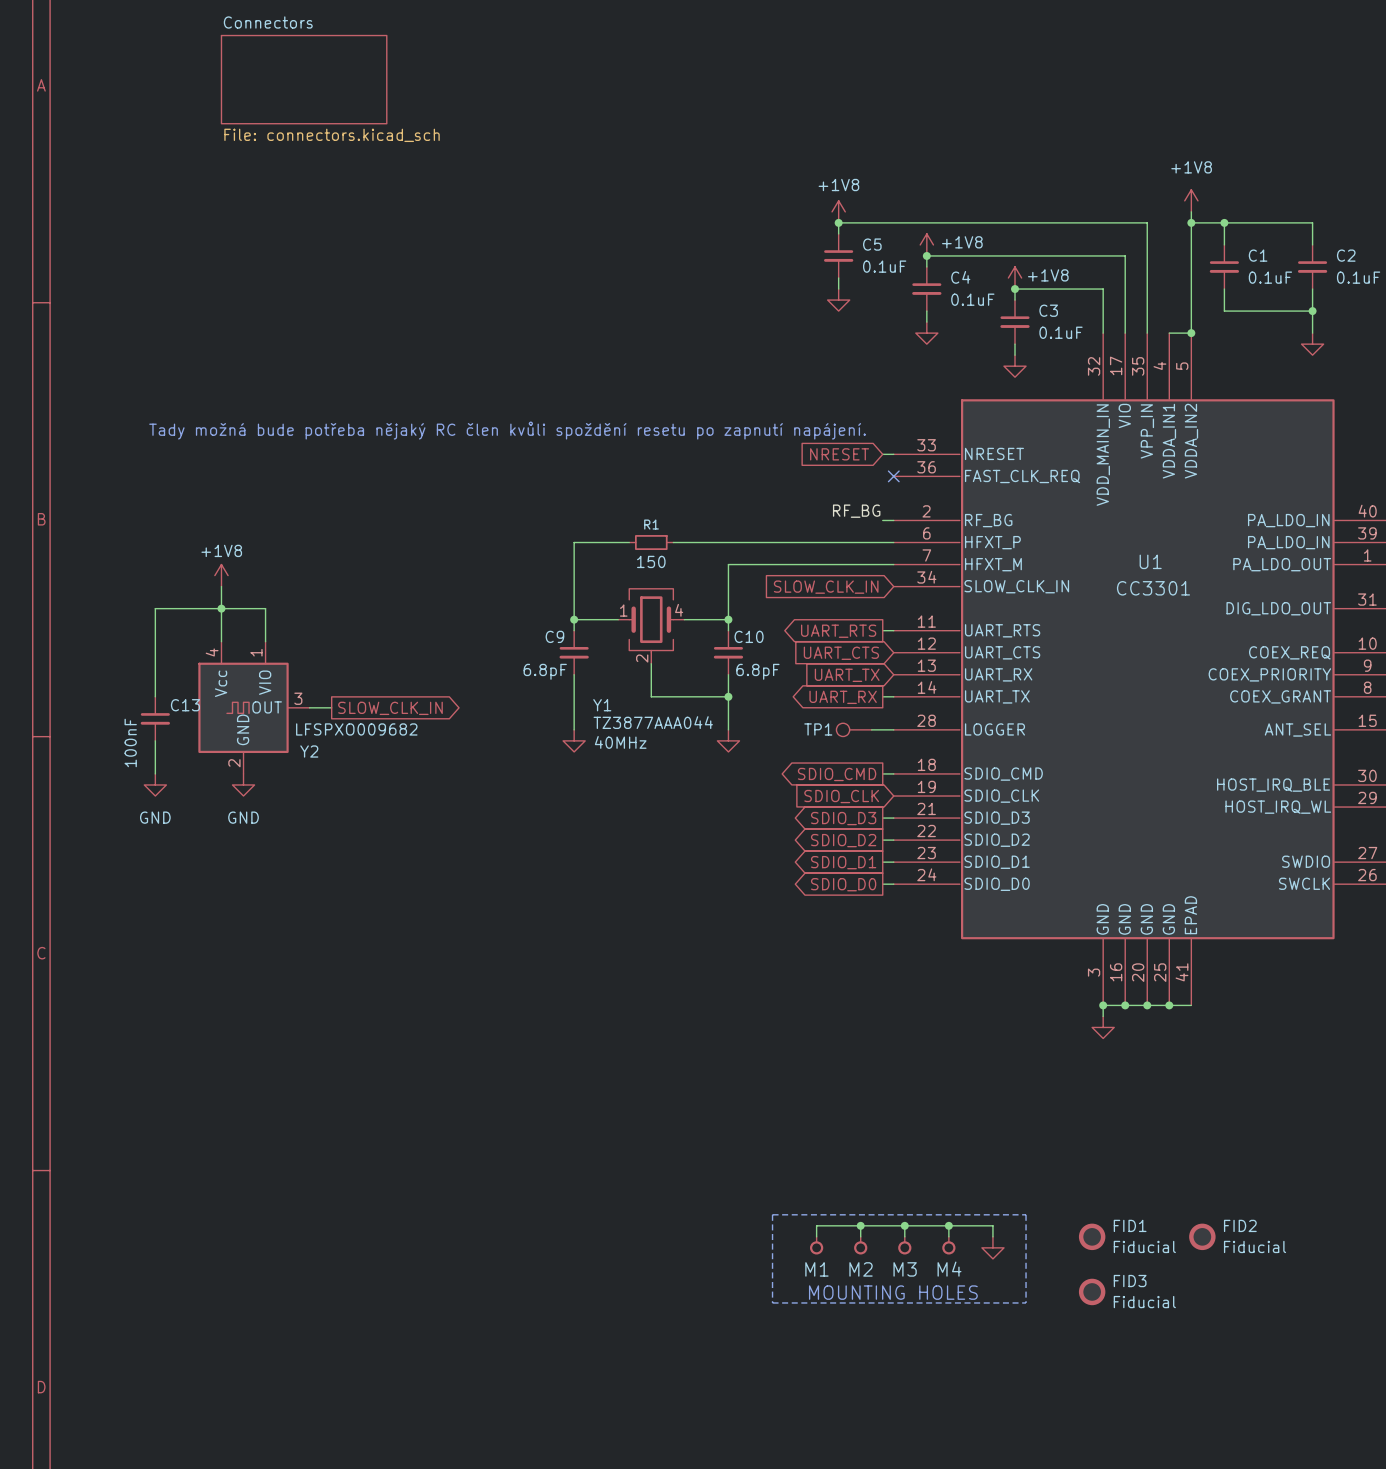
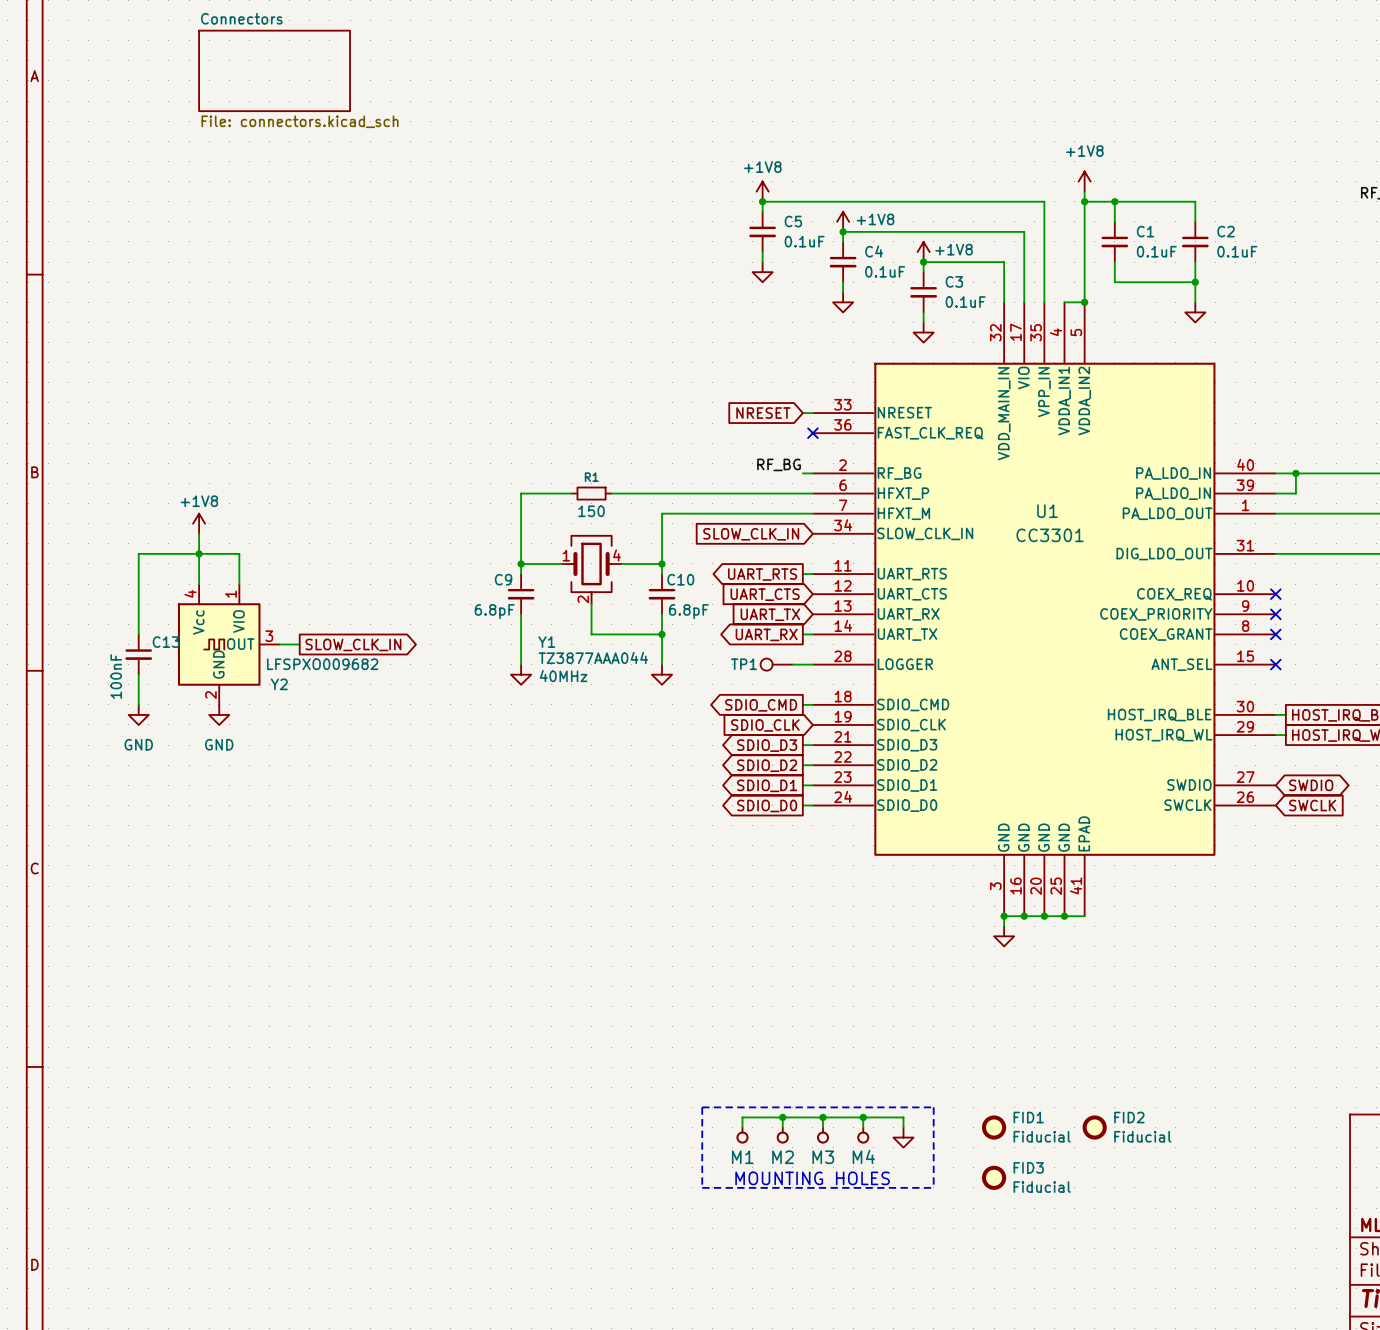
text: Tady možná bude potřeba nějaký RC člen kvůli spoždění resetu po zapnutí napájení. (507, 430) -> none

